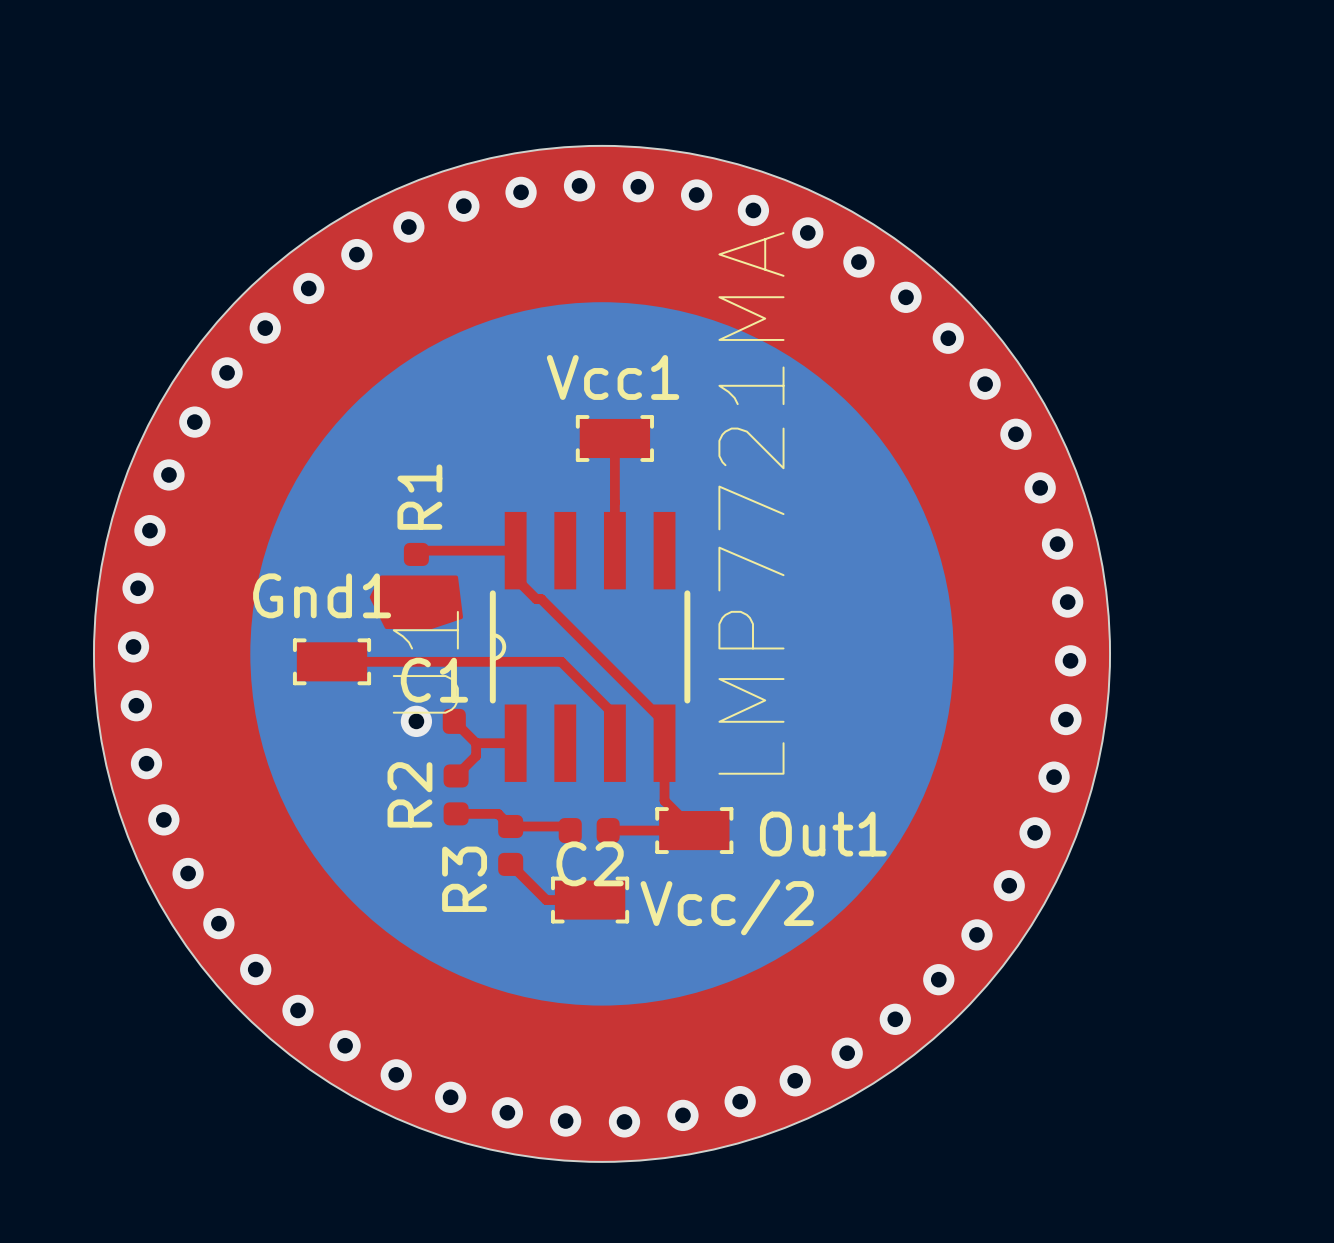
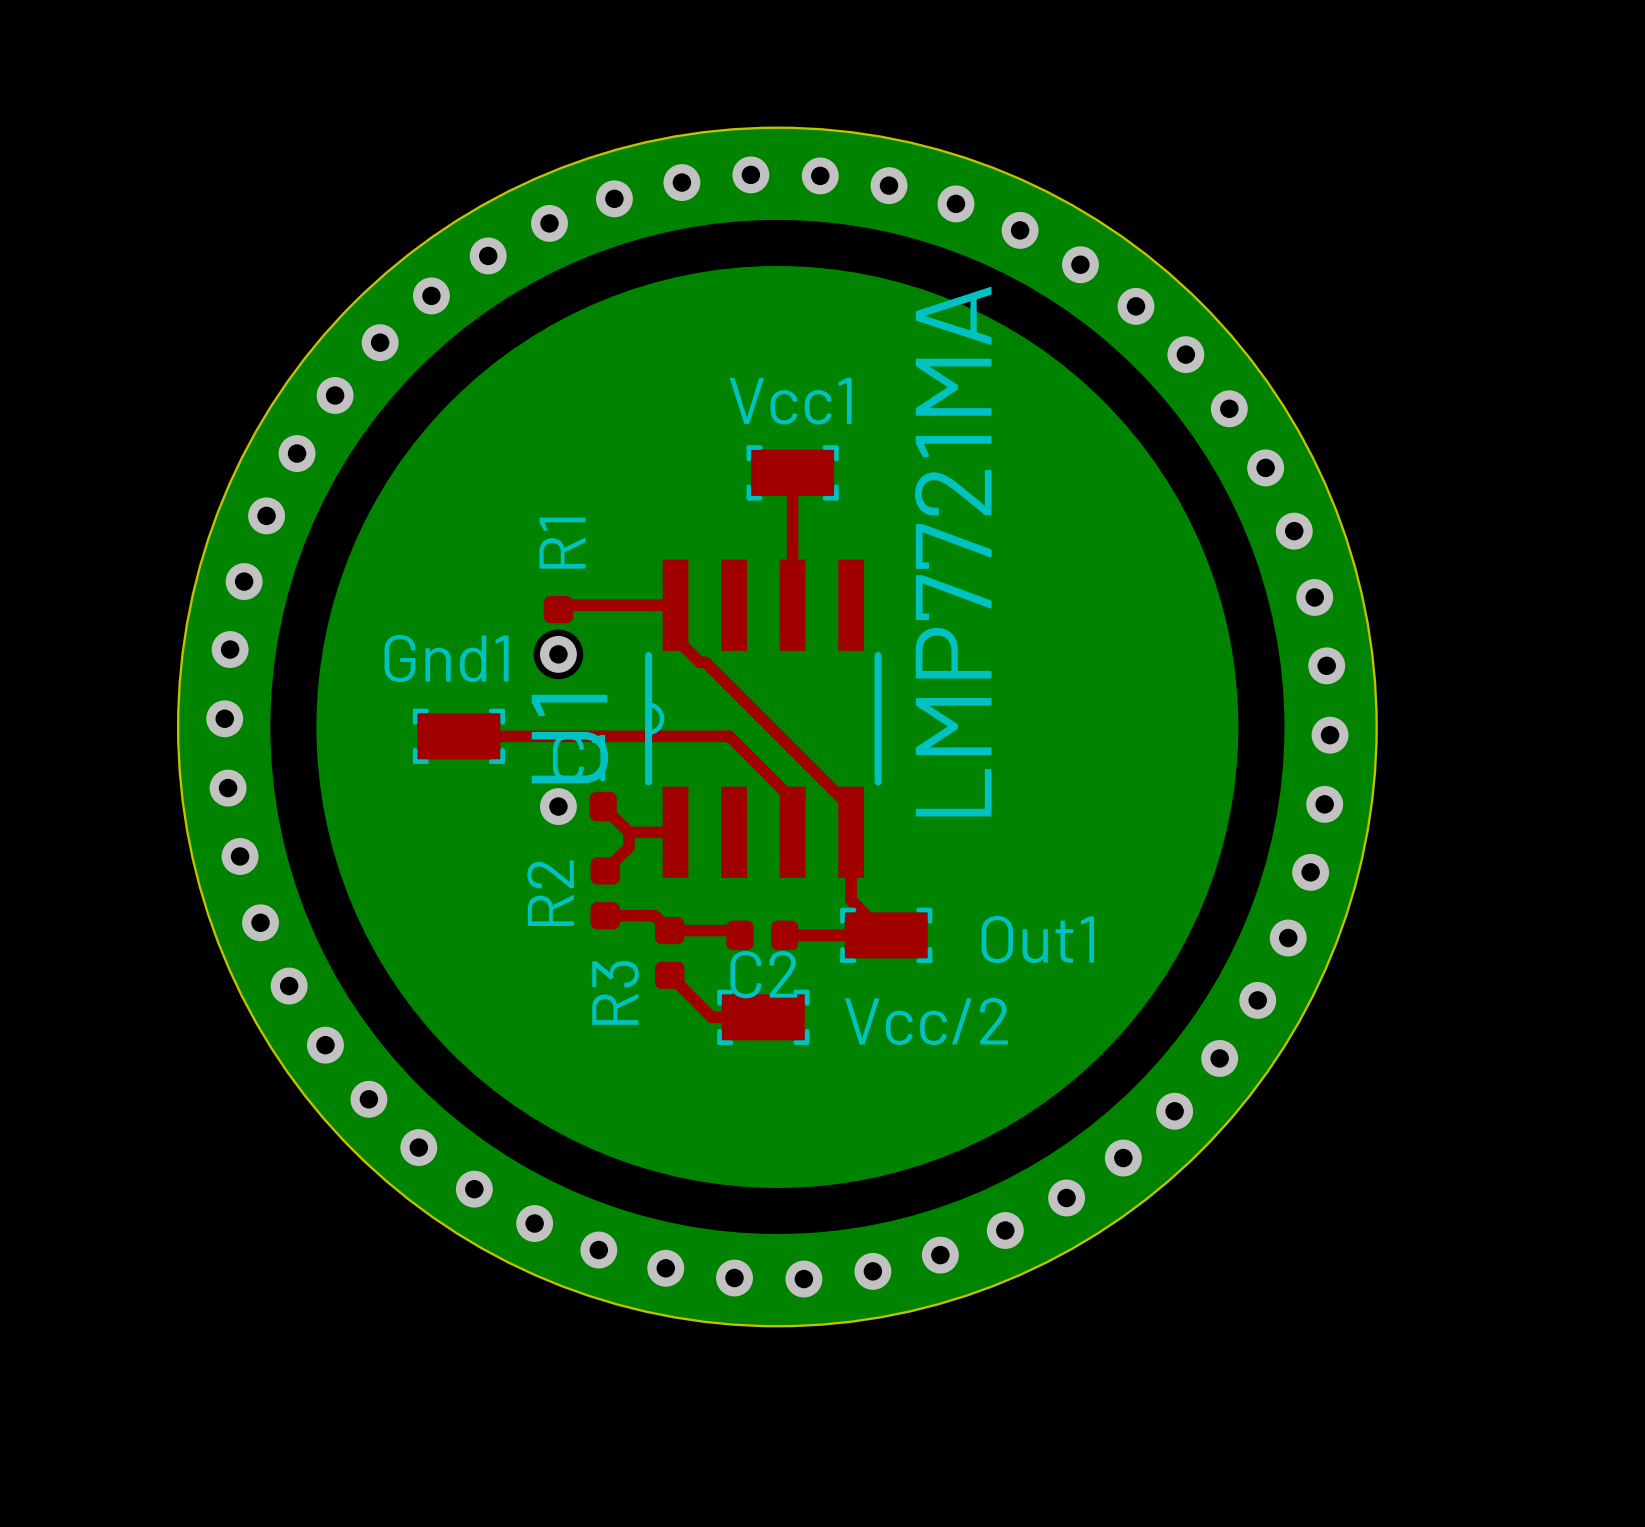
drawing: [93, 145, 1111, 1162] -> none
via: none -> (558, 654)

